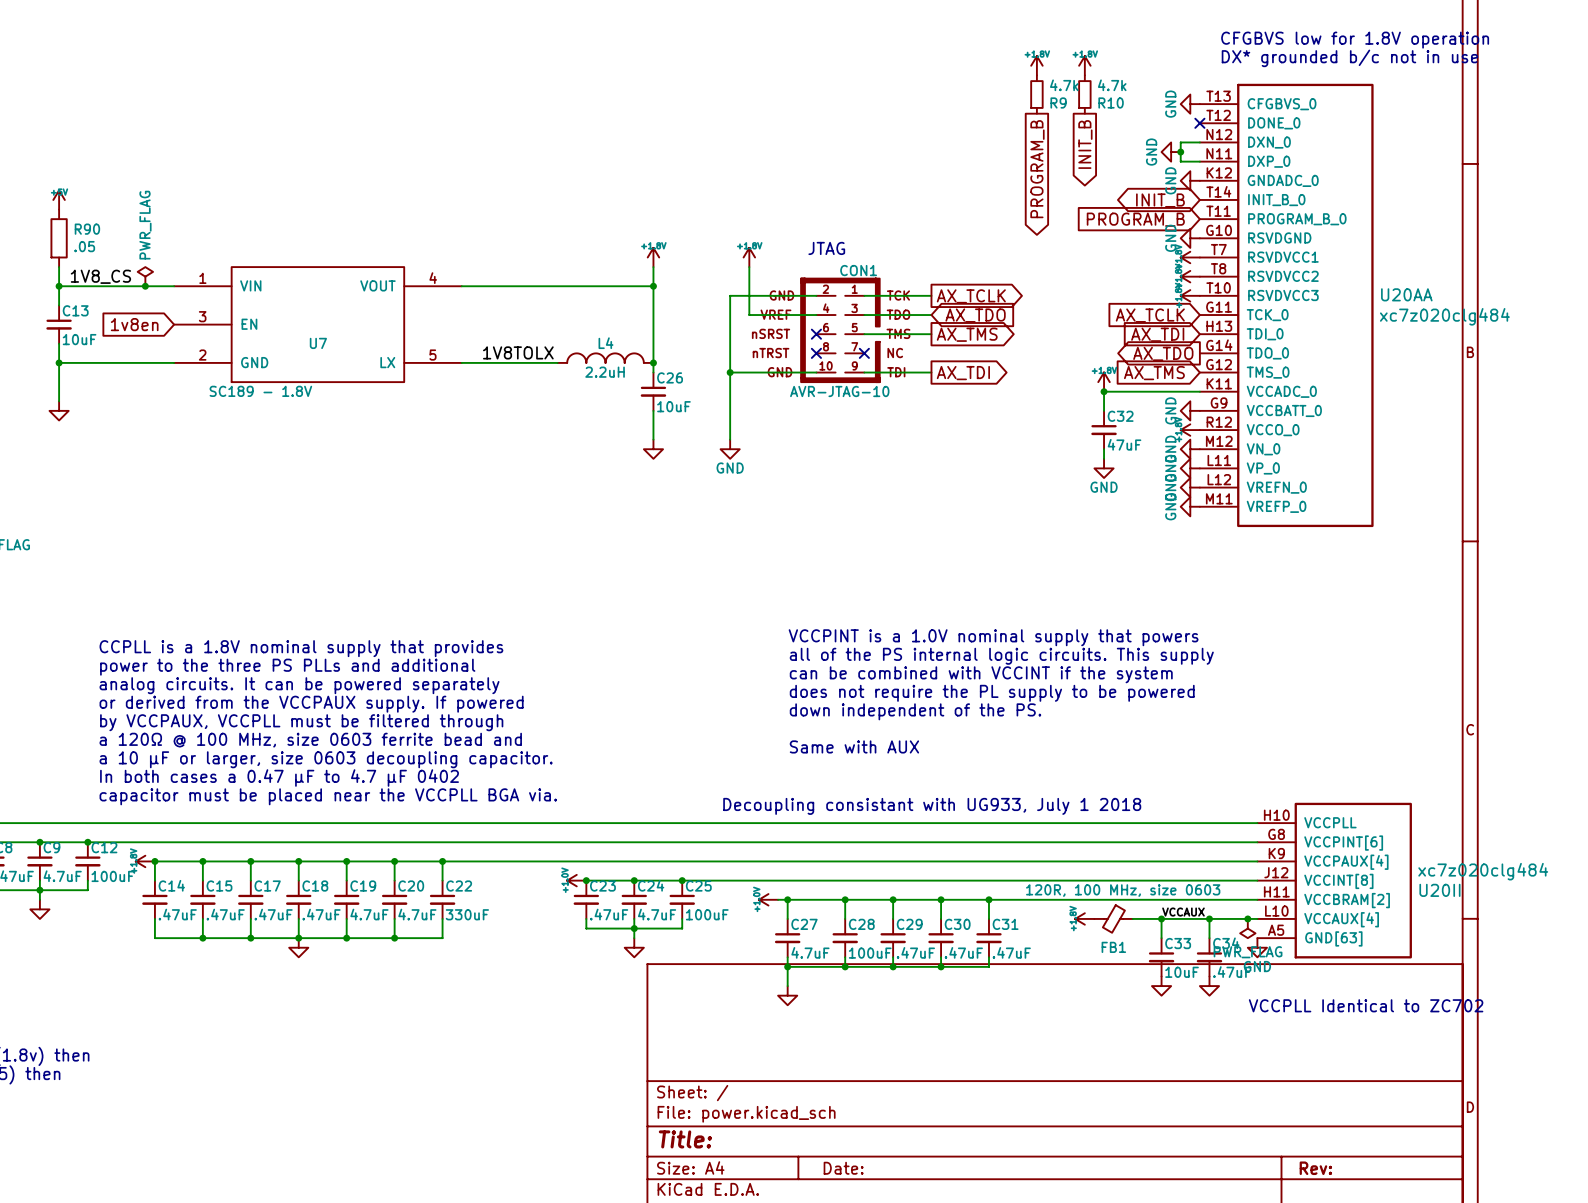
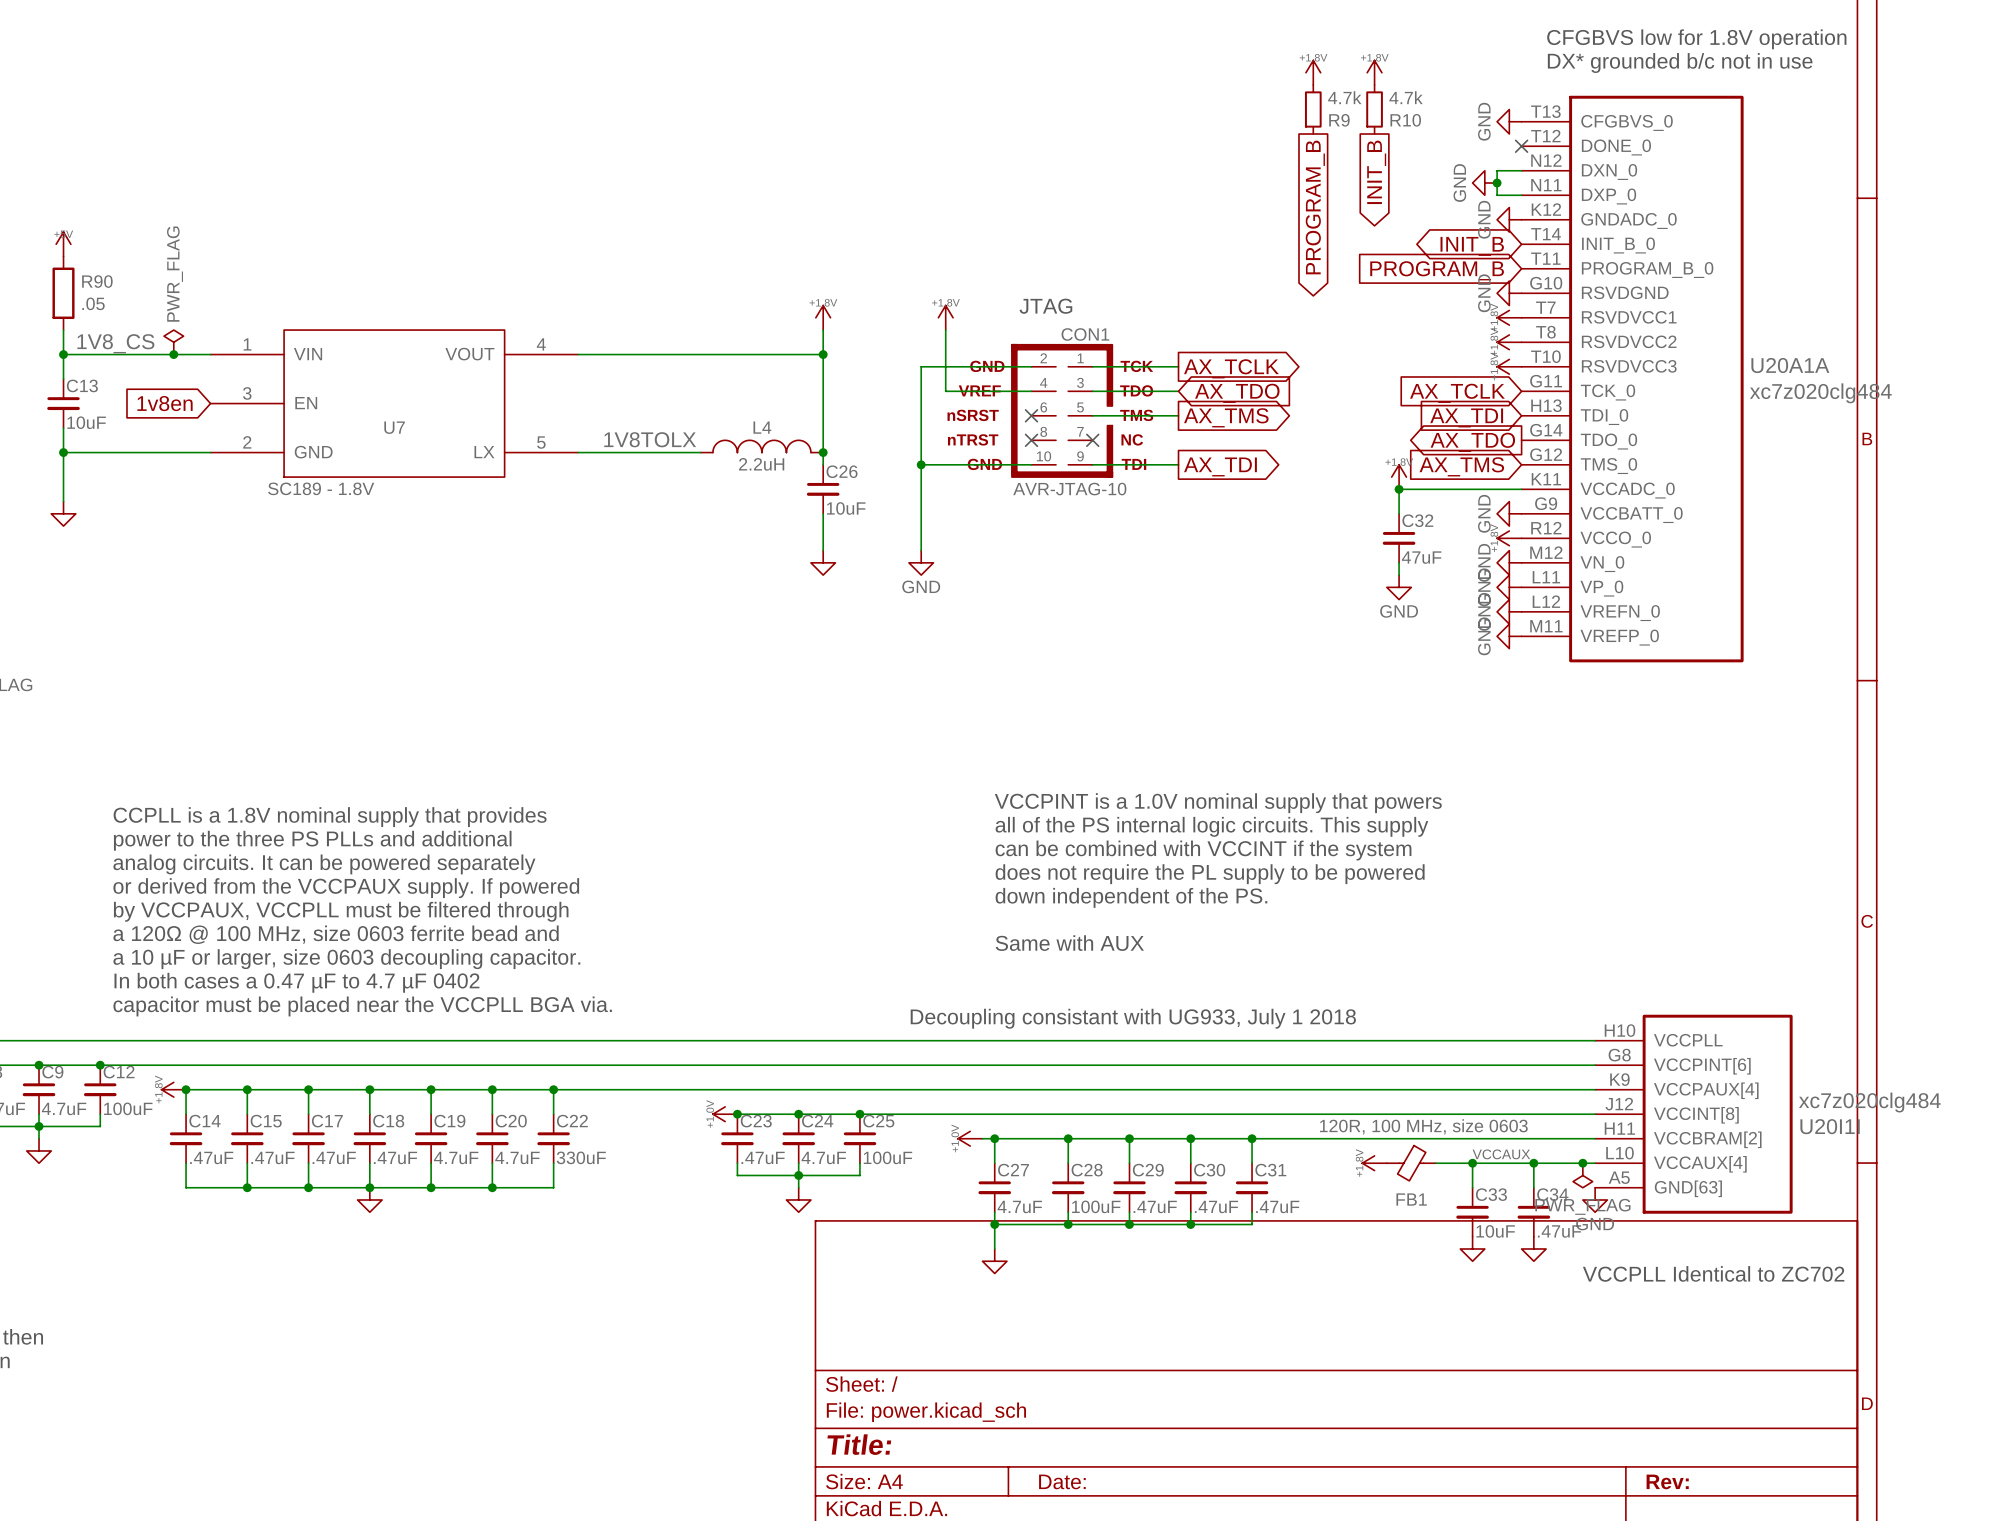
U20AA name: U20AA (1406, 294) -> U20A1A (1790, 365)
U20II name: U20II (1439, 890) -> U20I1I (1830, 1126)

